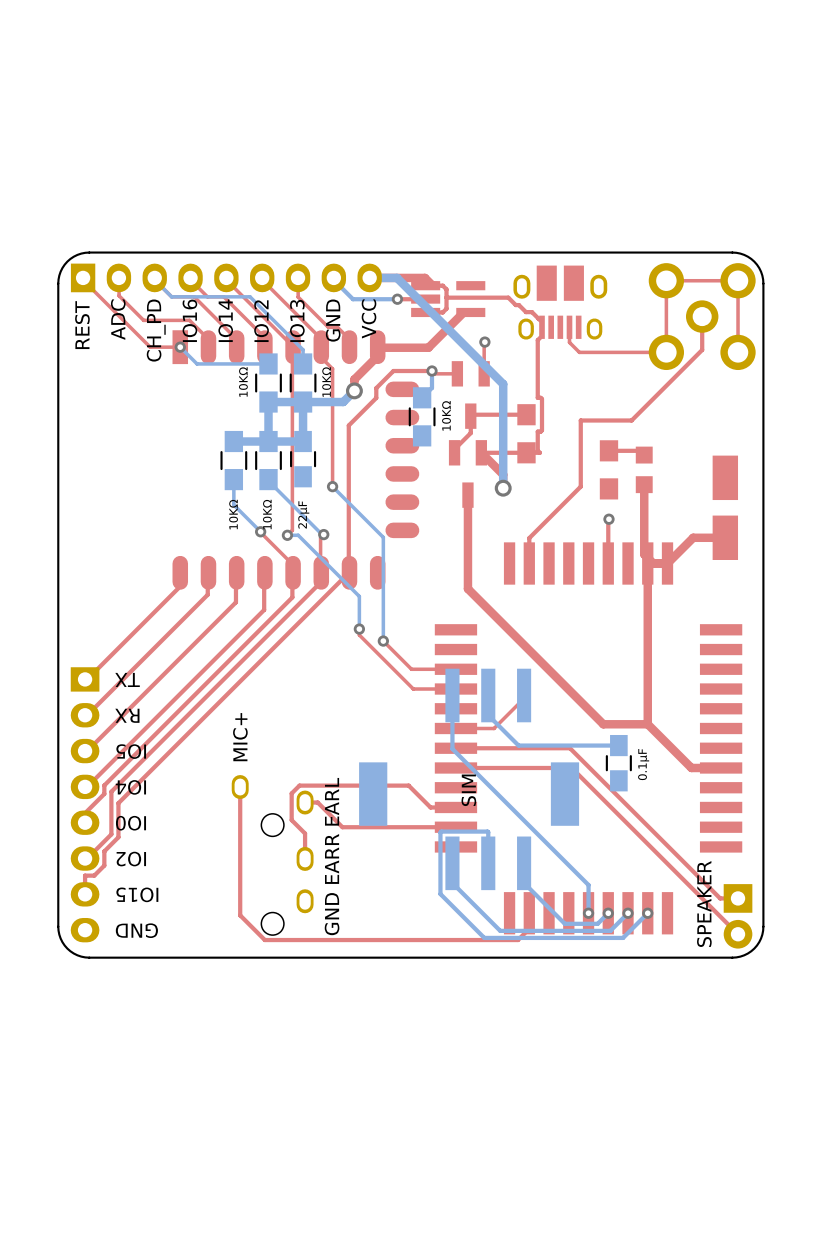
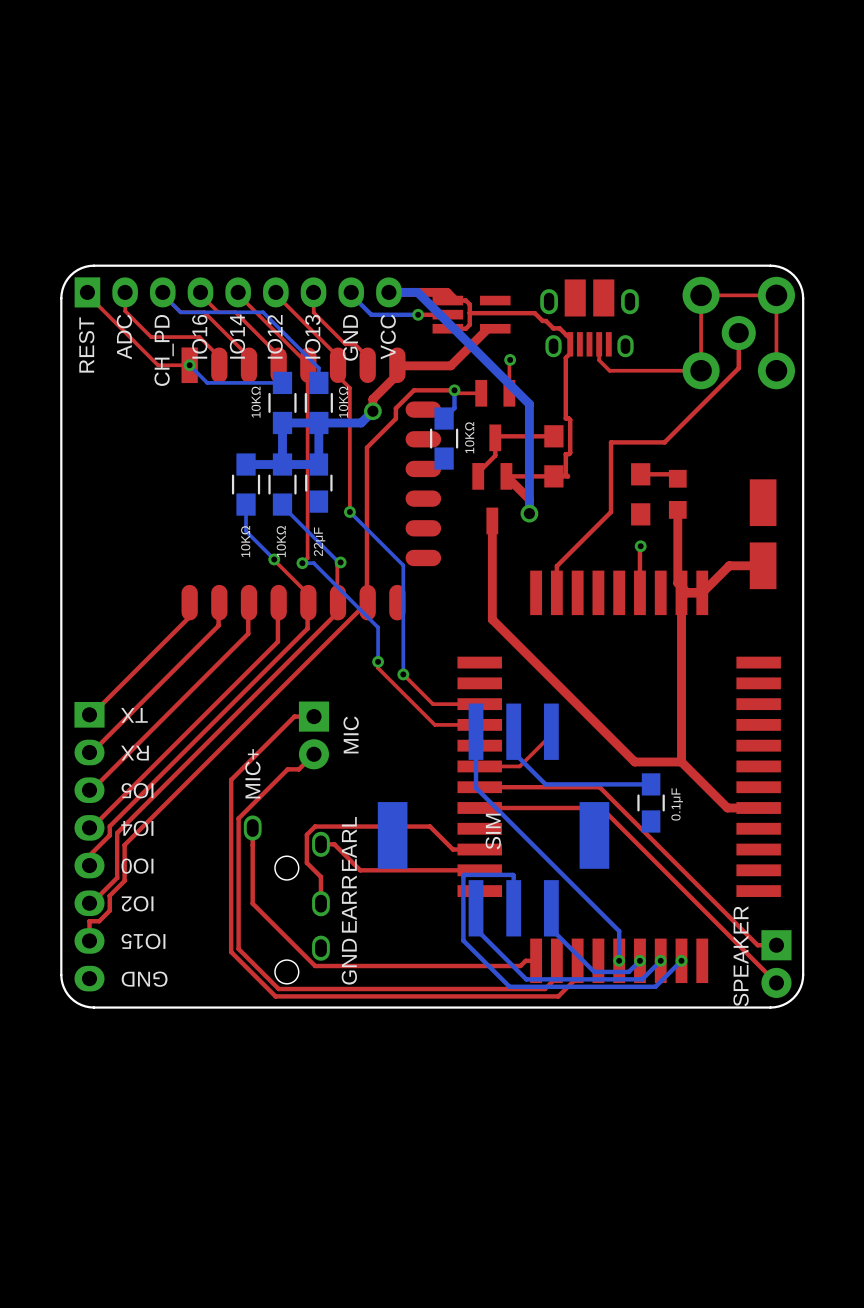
top track: none -> (313, 716) (294, 716) (231, 779) (231, 952) (275, 996) (558, 996) (577, 977) (577, 960)
text: none -> MIC (351, 734)
part: none -> (313, 735)
top track: (240, 858) (240, 915) -> (313, 754) (298, 769) (287, 769) (238, 818) (238, 948) (252, 963)
top track: none -> (252, 903) (315, 966) (520, 966) (525, 960) (536, 960)

